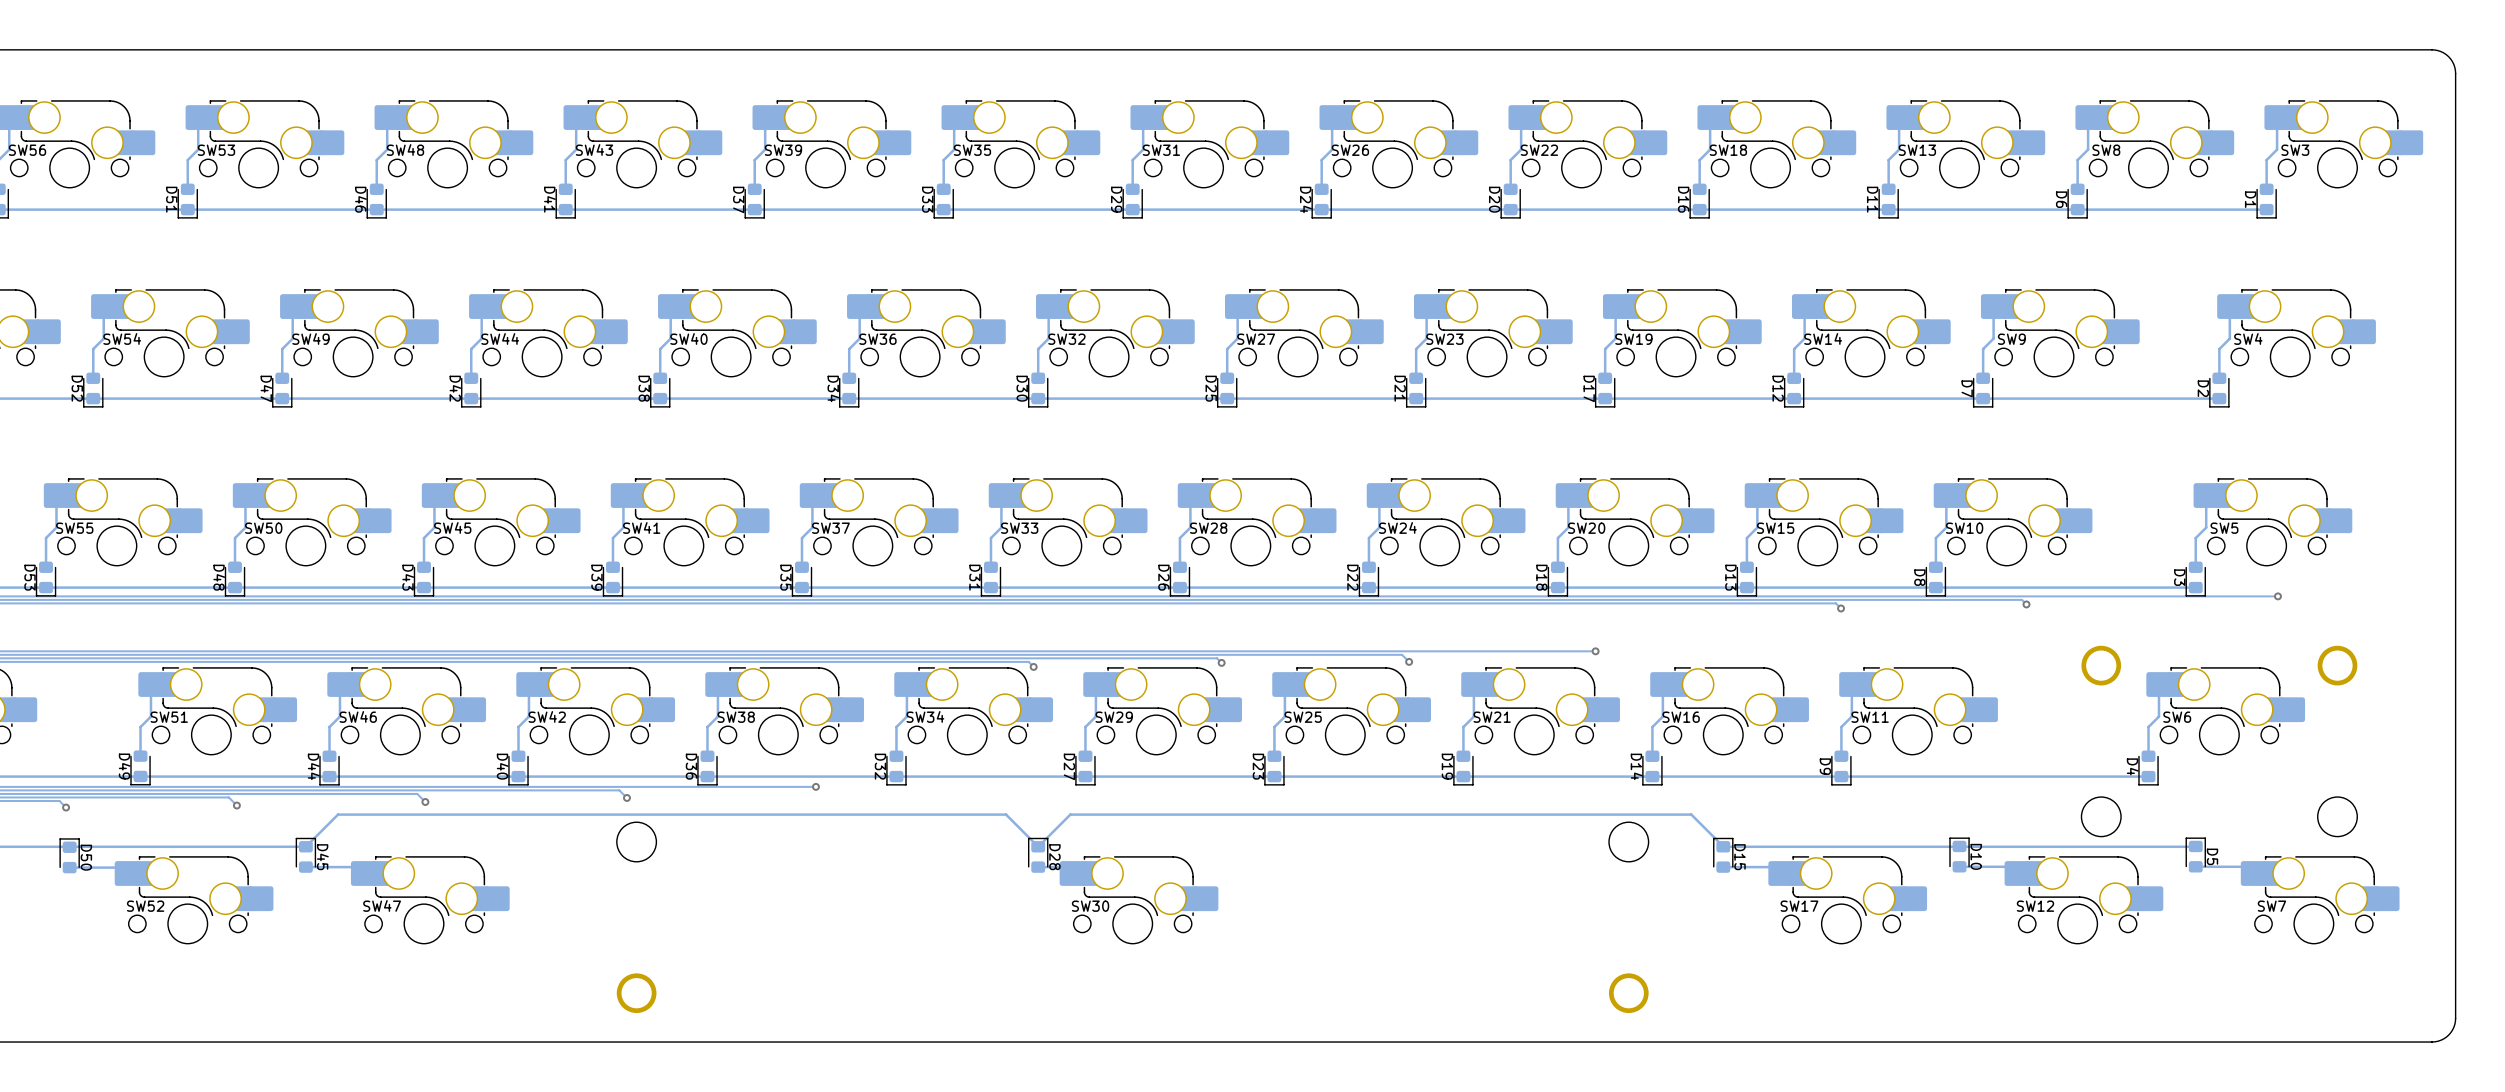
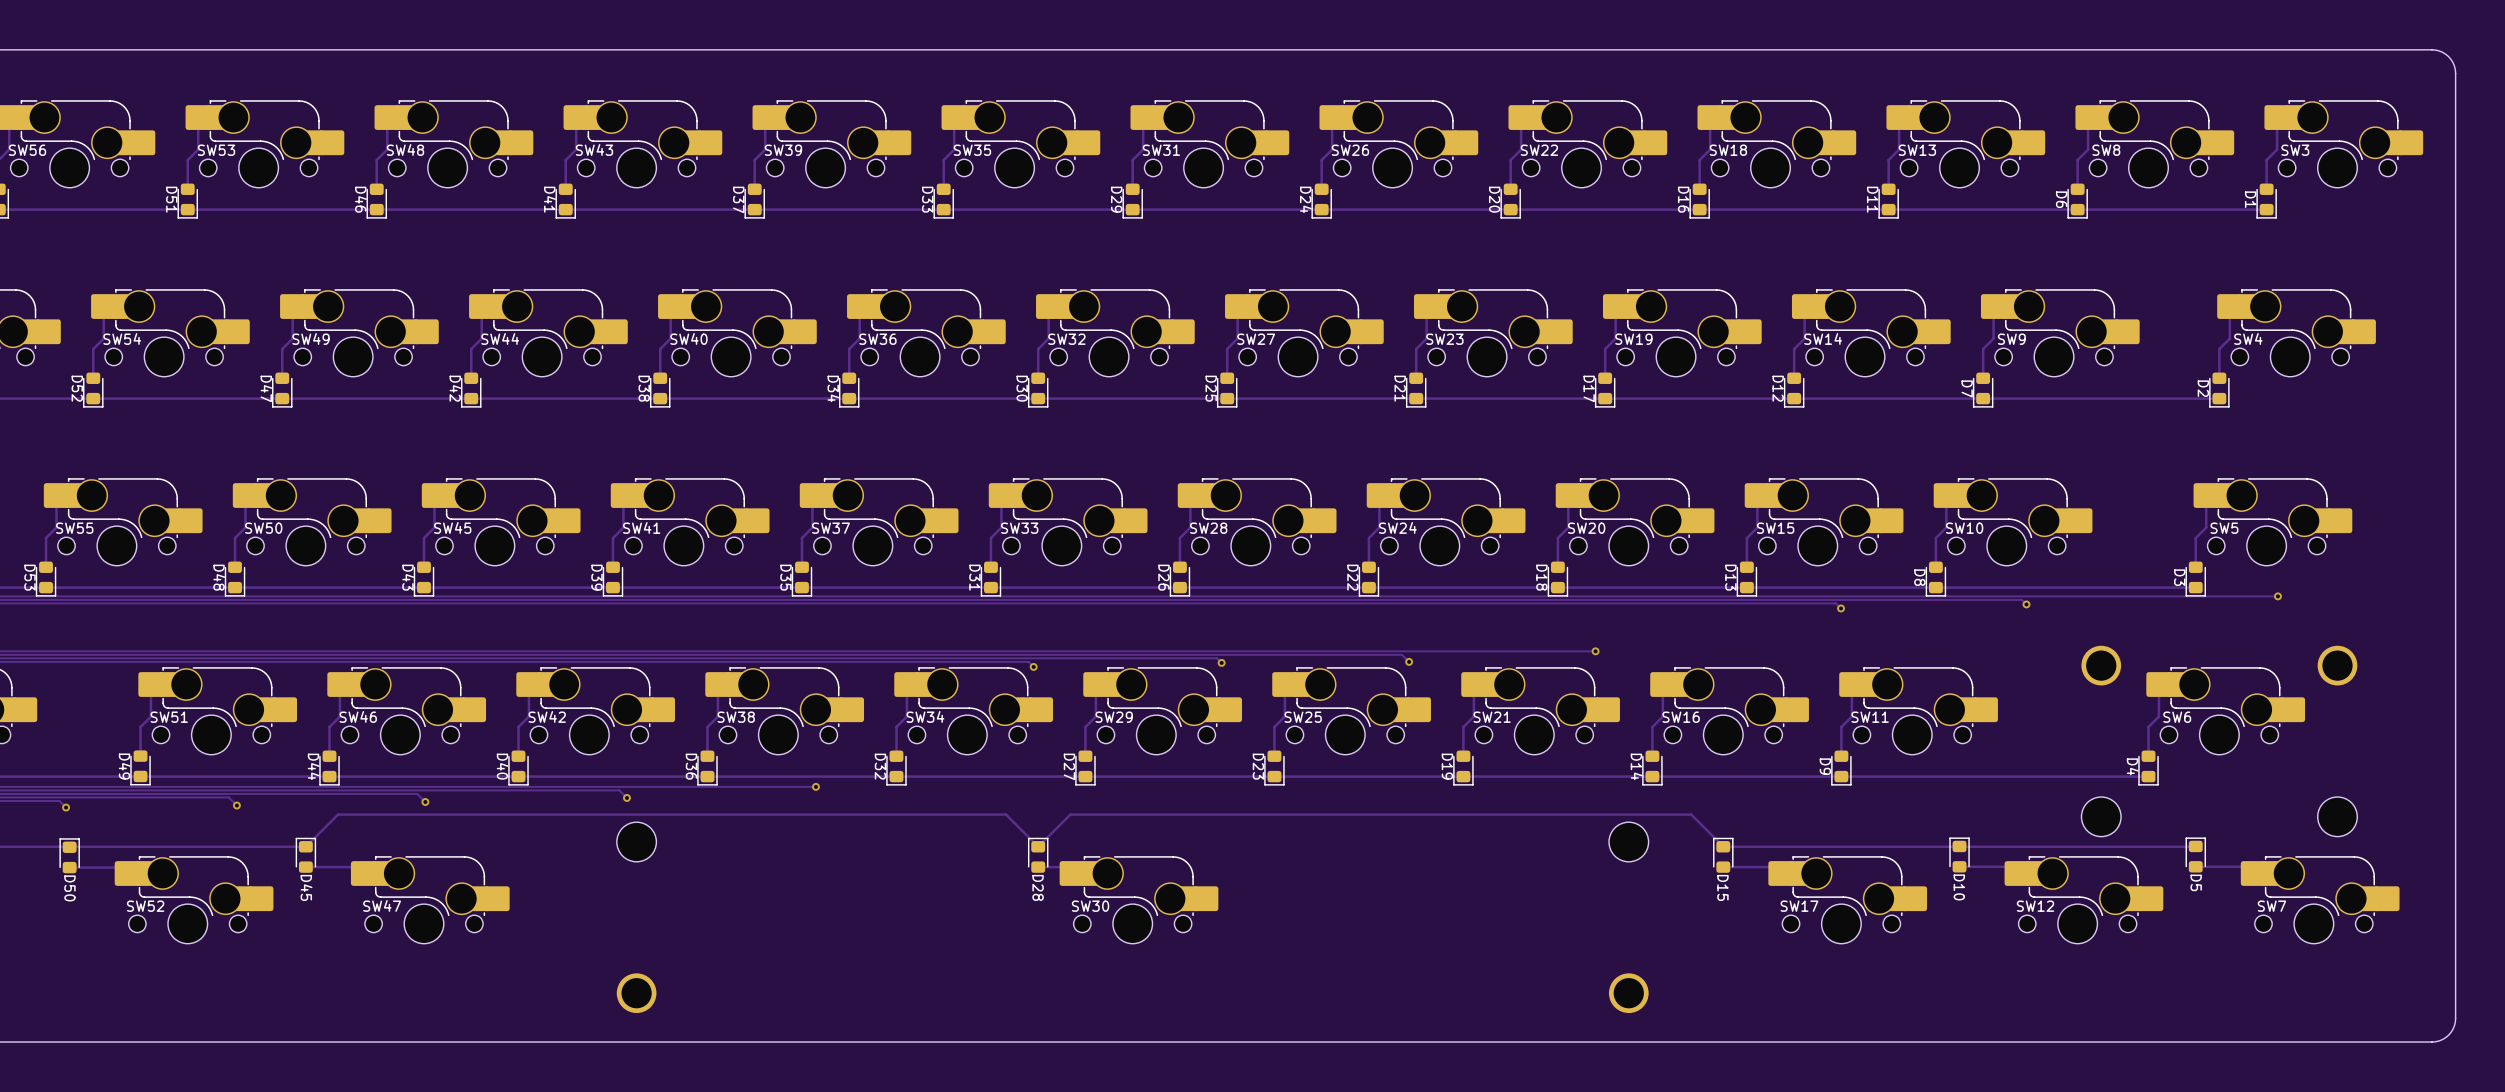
D10 name position: D10 (1976, 856) -> D10 (1959, 887)
D5 name position: D5 (2212, 856) -> D5 (2196, 882)
D50 name position: D50 (86, 857) -> D50 (69, 888)
D45 name position: D45 (322, 857) -> D45 (306, 887)
D28 name position: D28 (1054, 857) -> D28 (1038, 887)
D15 name position: D15 (1740, 857) -> D15 (1722, 887)

